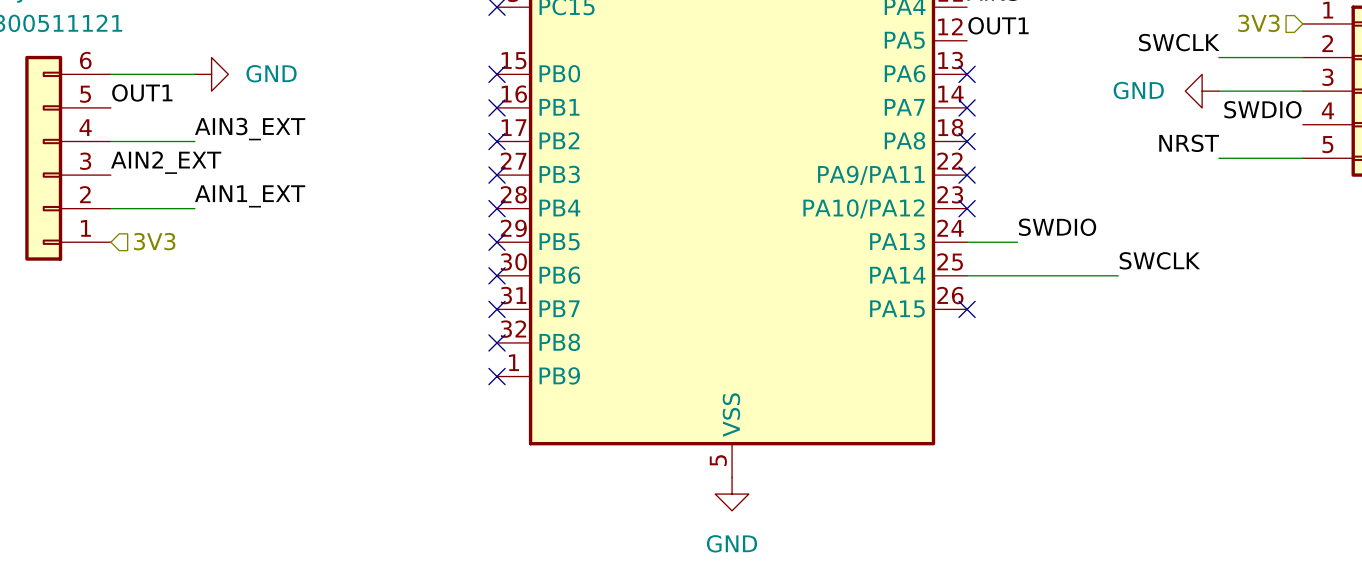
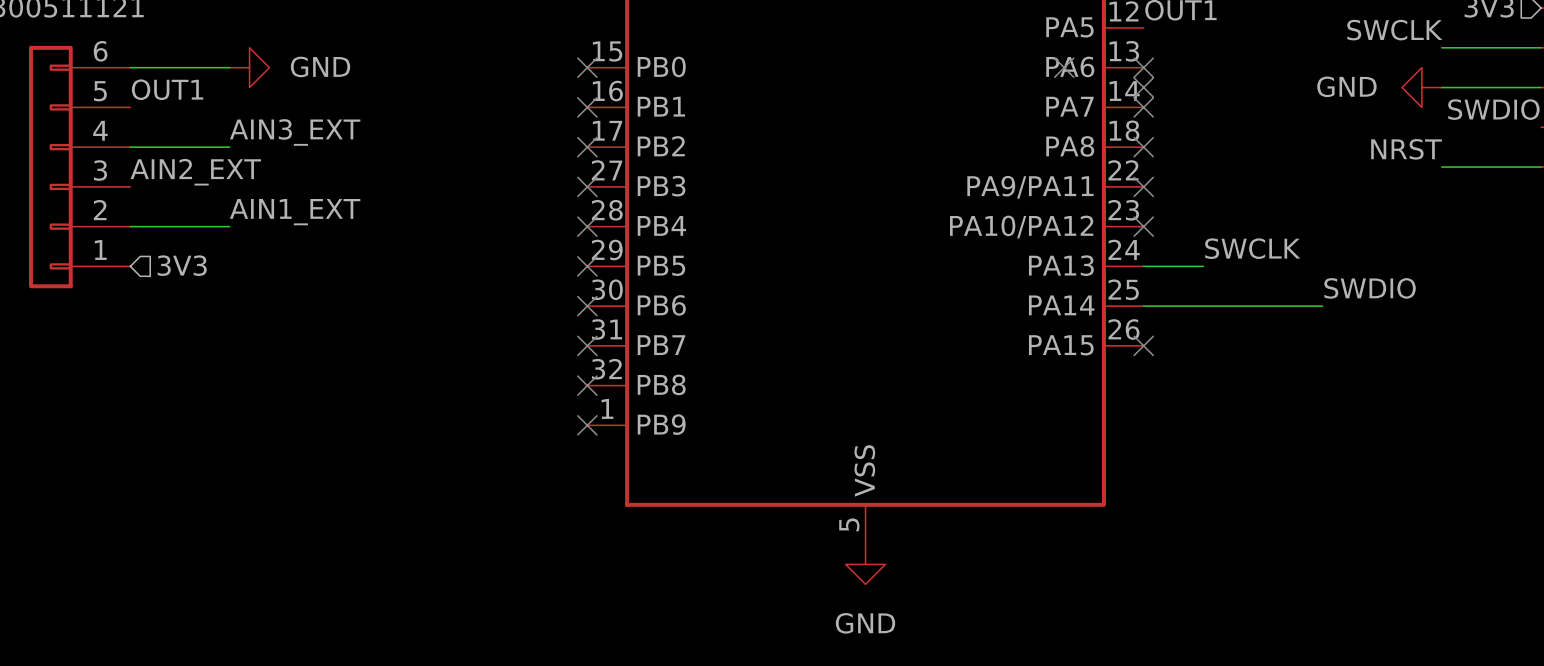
no-connect mark: none -> (1064, 67)
no-connect mark: none -> (1143, 87)
label: SWDIO (1057, 227) -> SWCLK (1252, 248)
label: SWCLK (1159, 260) -> SWDIO (1370, 288)

